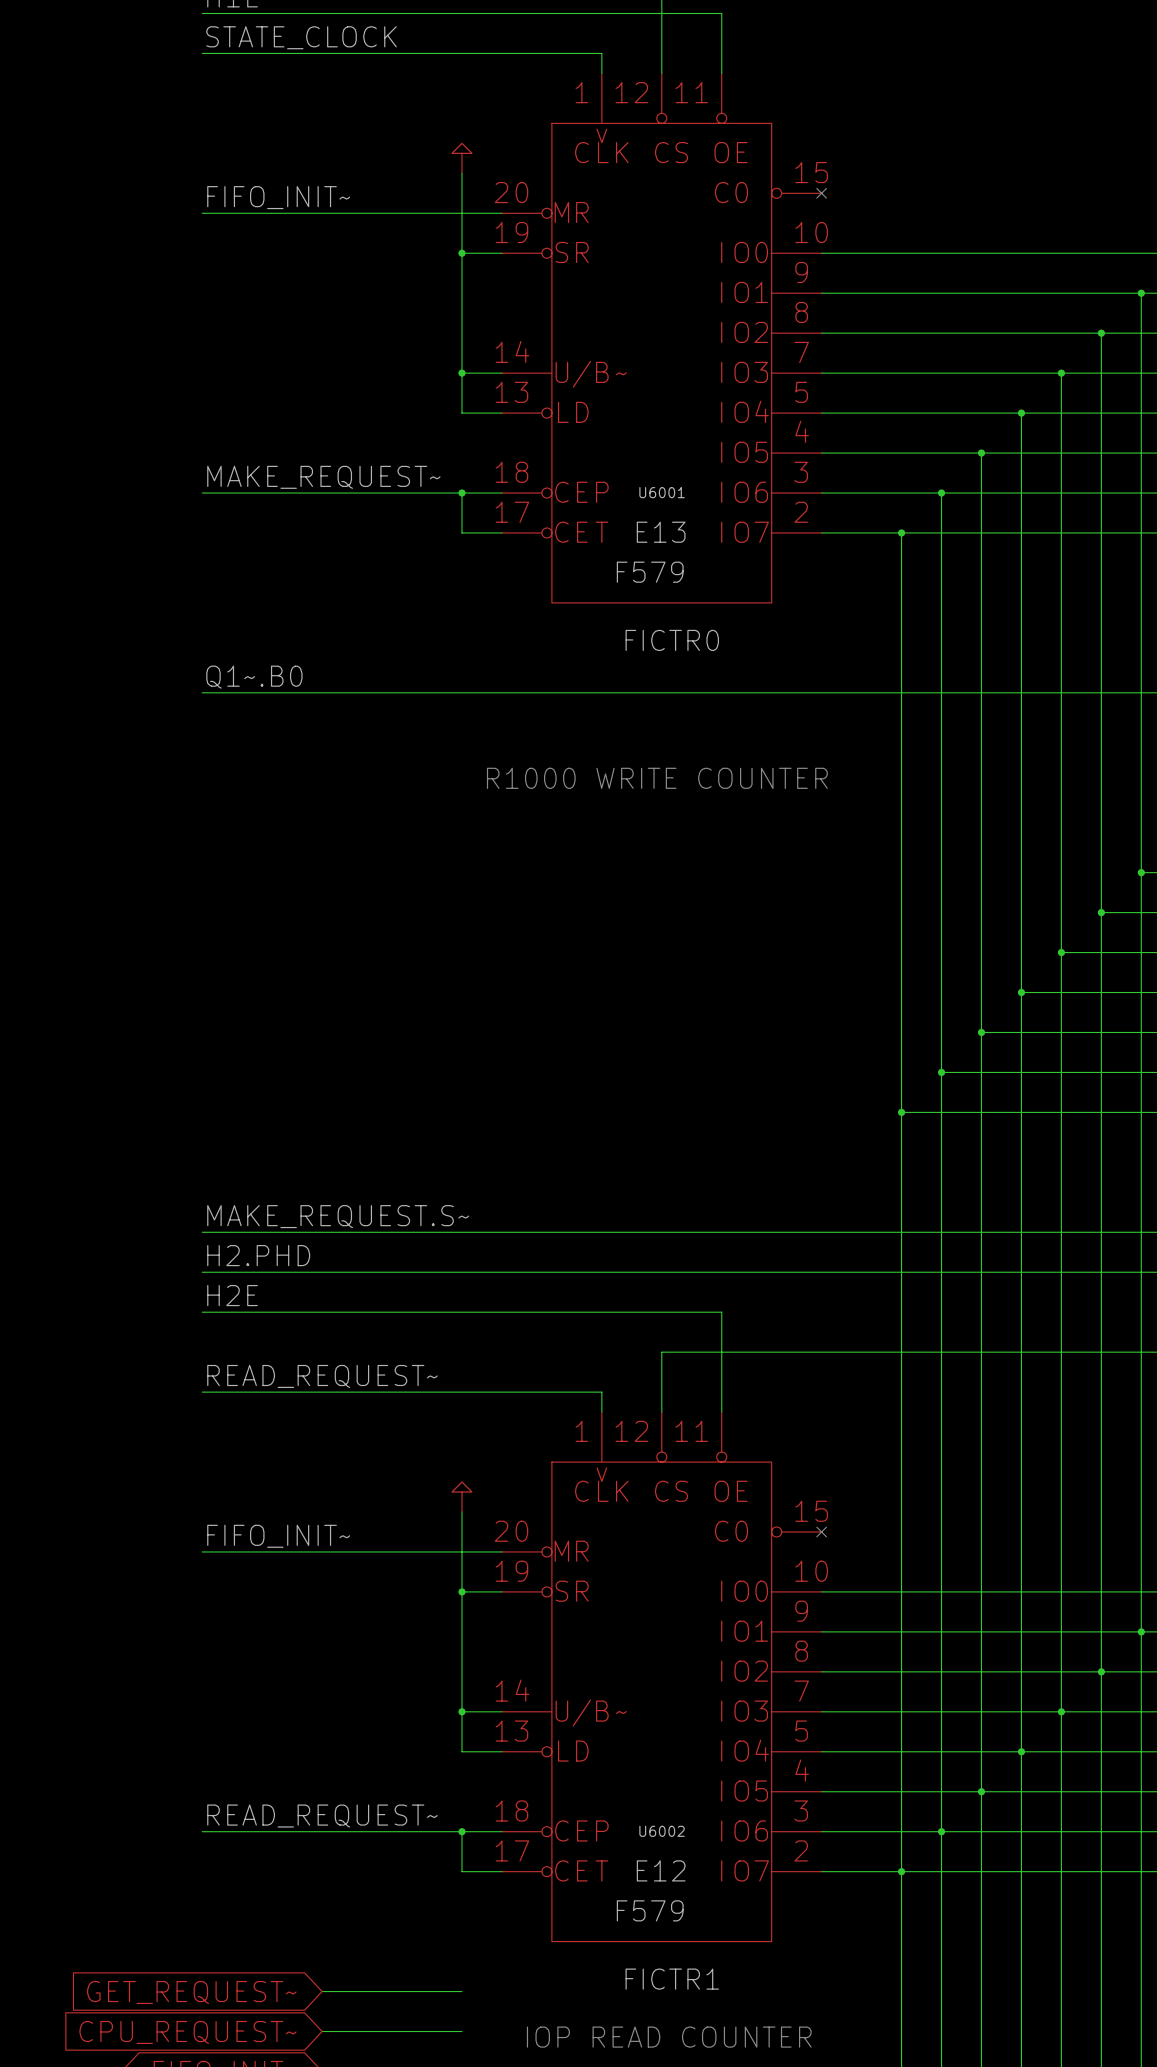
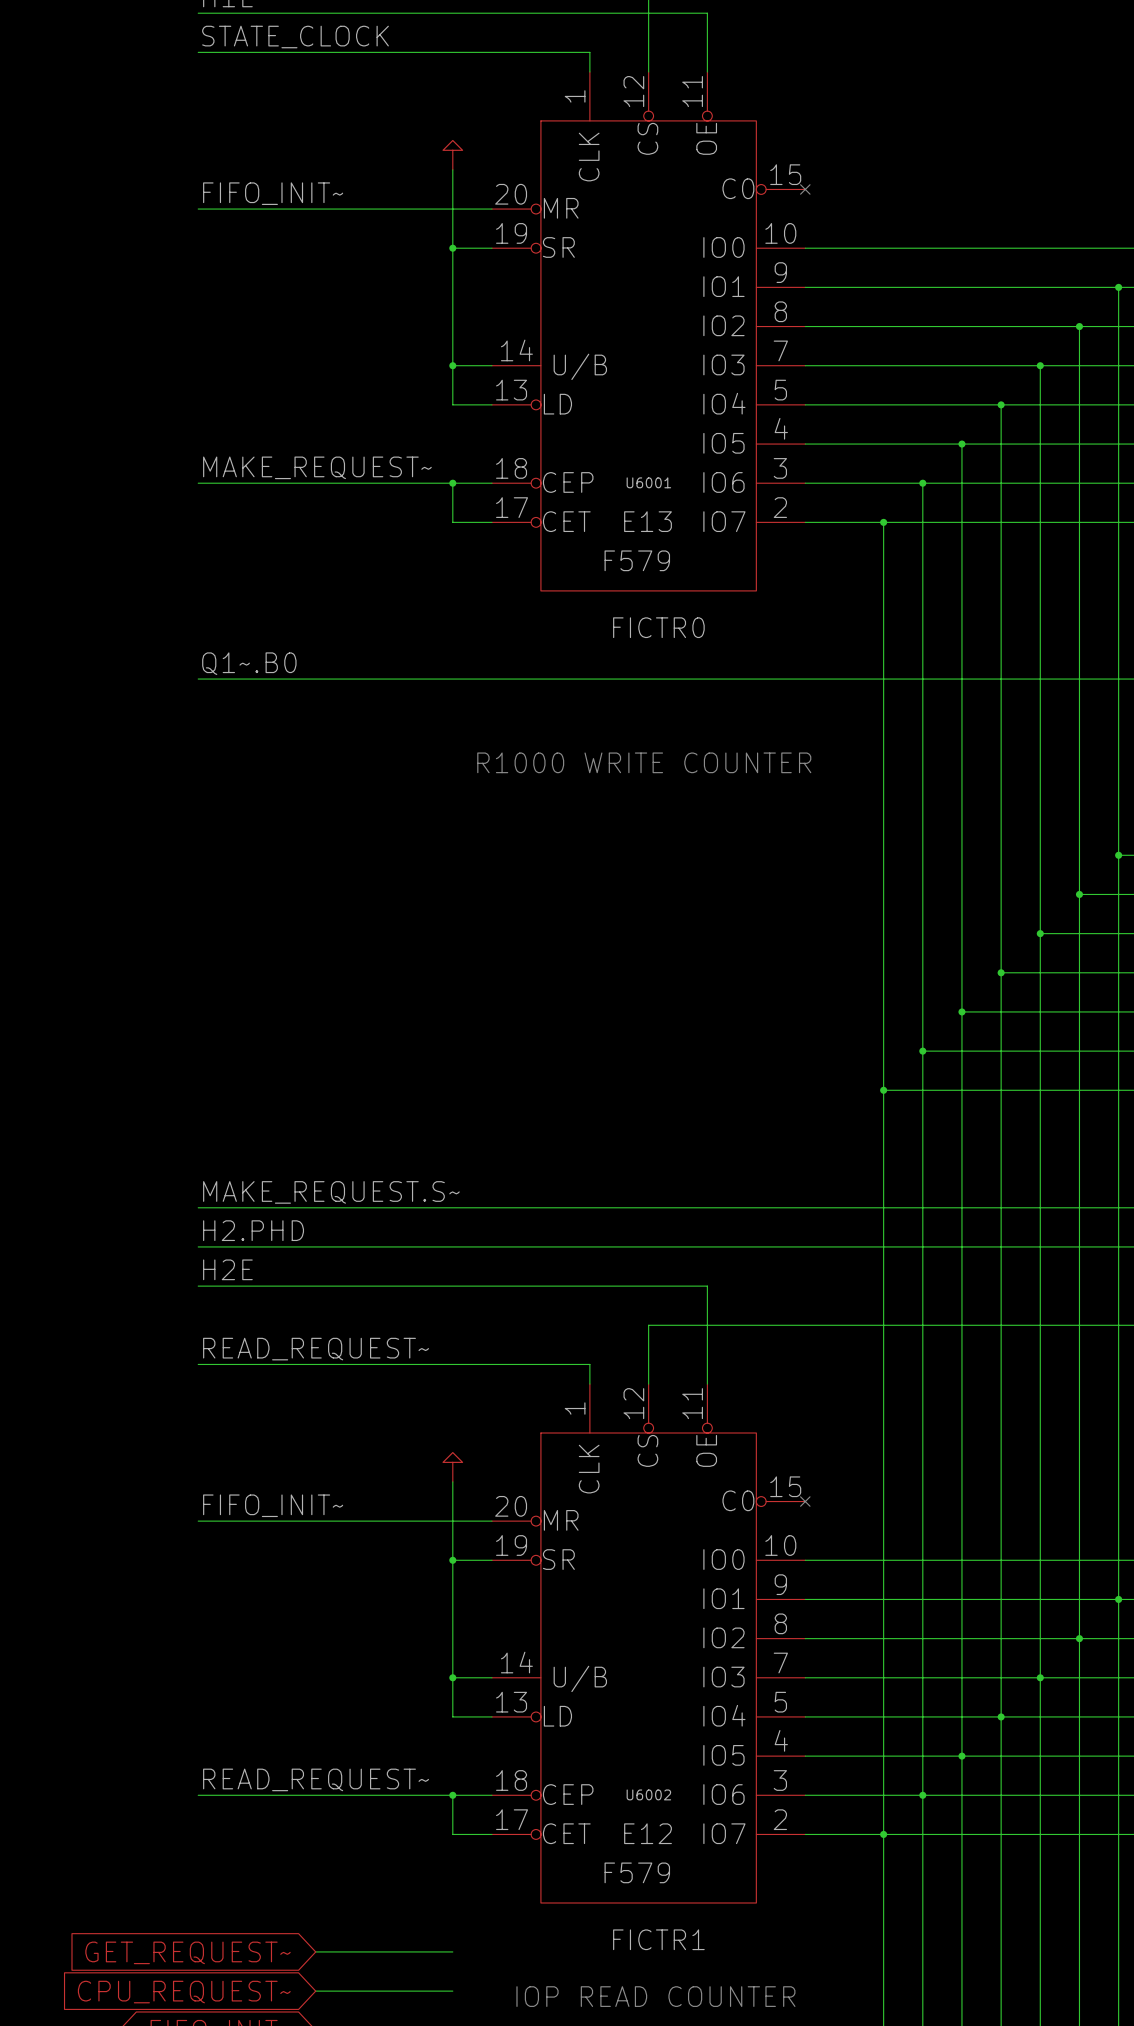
U6001 symbol: [501, 73, 822, 603] -> [491, 71, 806, 591]
U6002 symbol: [501, 1412, 822, 1942] -> [491, 1384, 806, 1903]

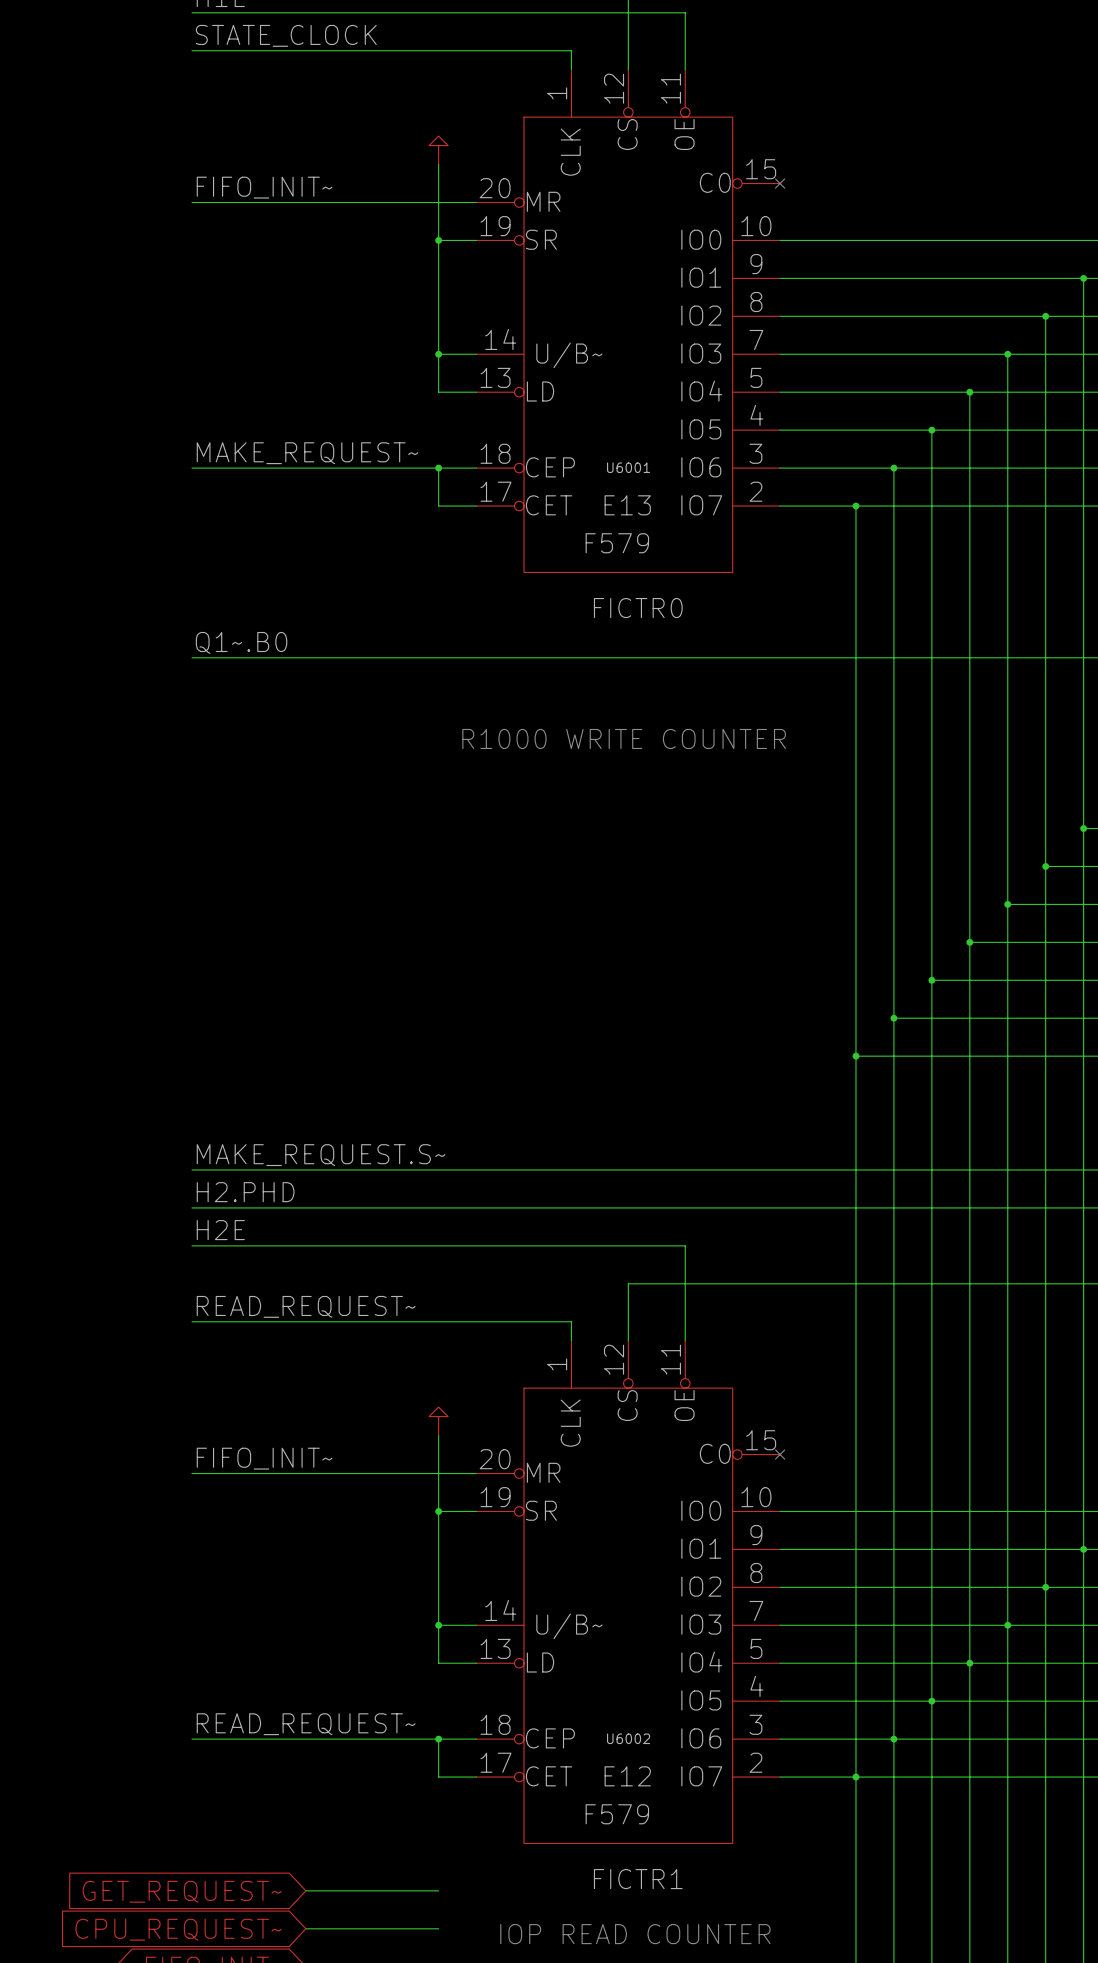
U6001 pin name: U/B (580, 366) -> U/B~ (569, 355)
U6002 pin name: U/B (580, 1678) -> U/B~ (569, 1626)

